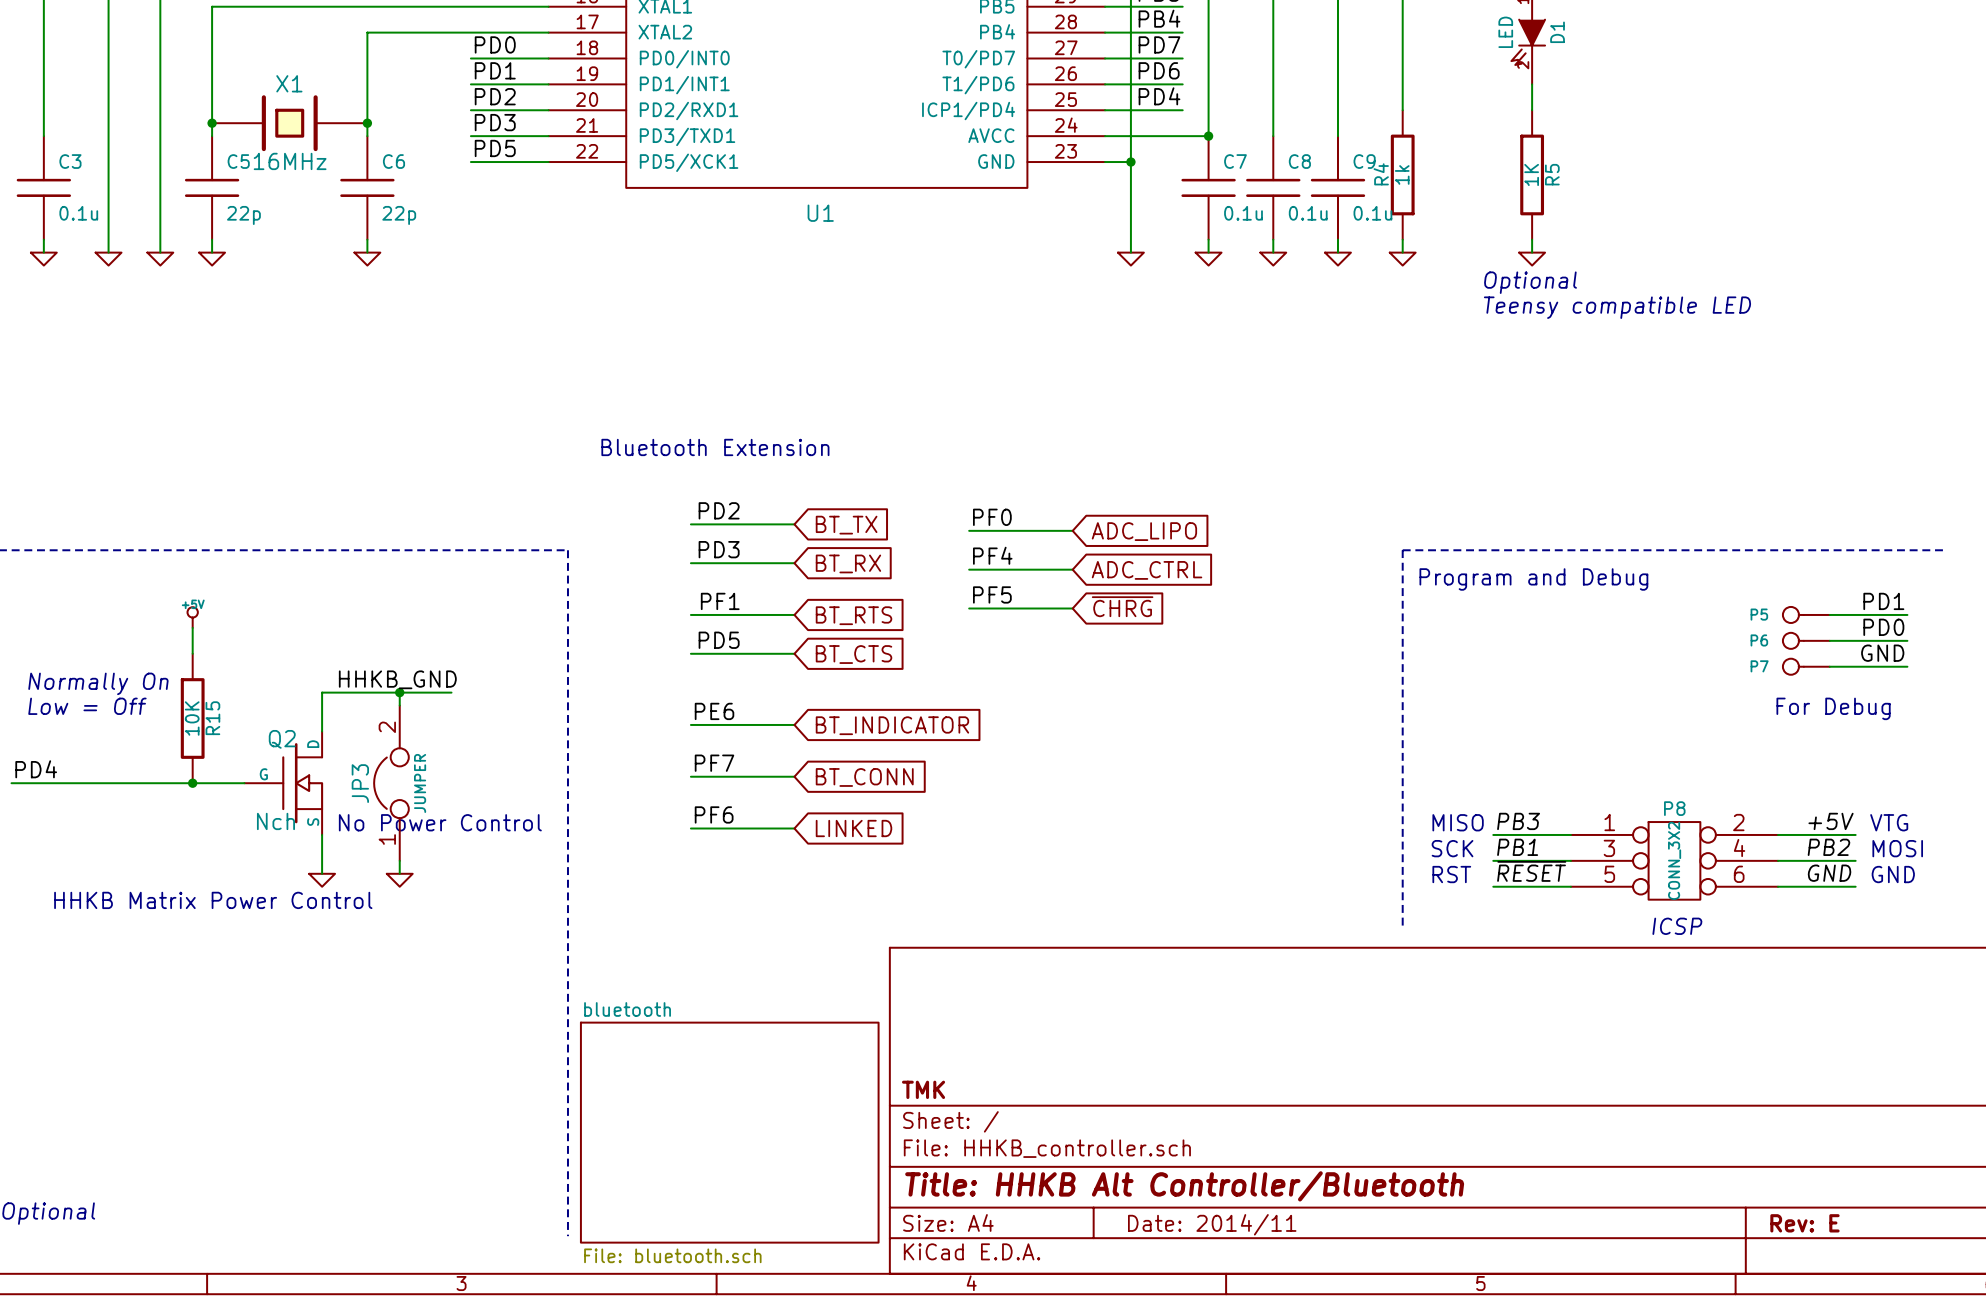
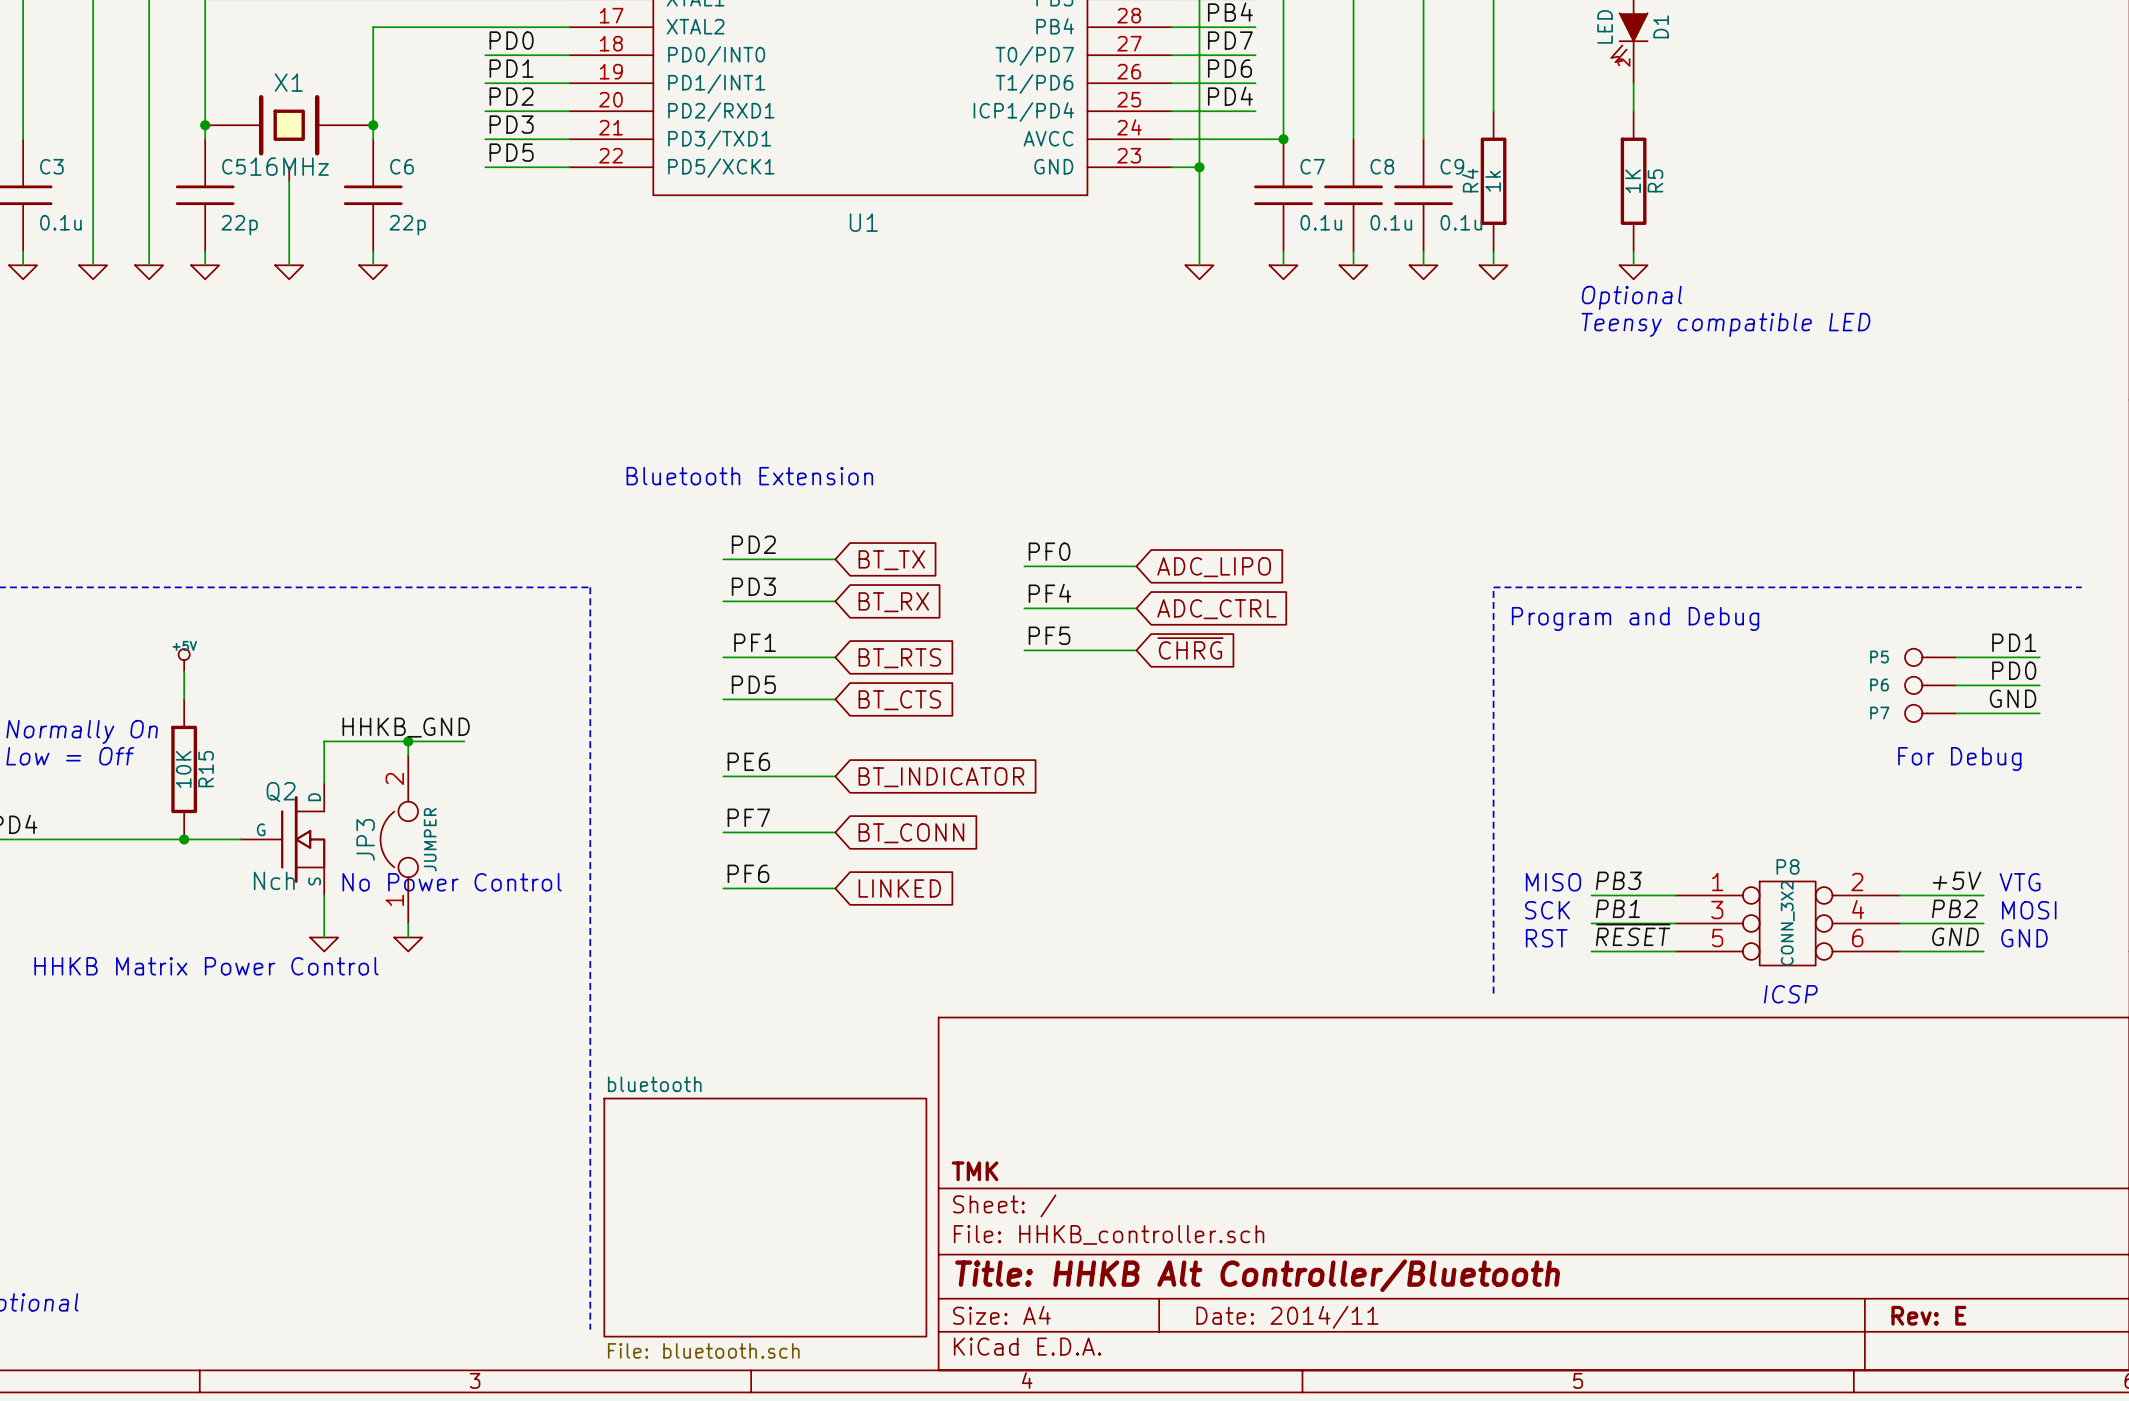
X1 symbol: [212, 95, 368, 152] -> [205, 94, 374, 182]
wire: none -> (289, 181) (289, 265)
power symbol: none -> (289, 272)

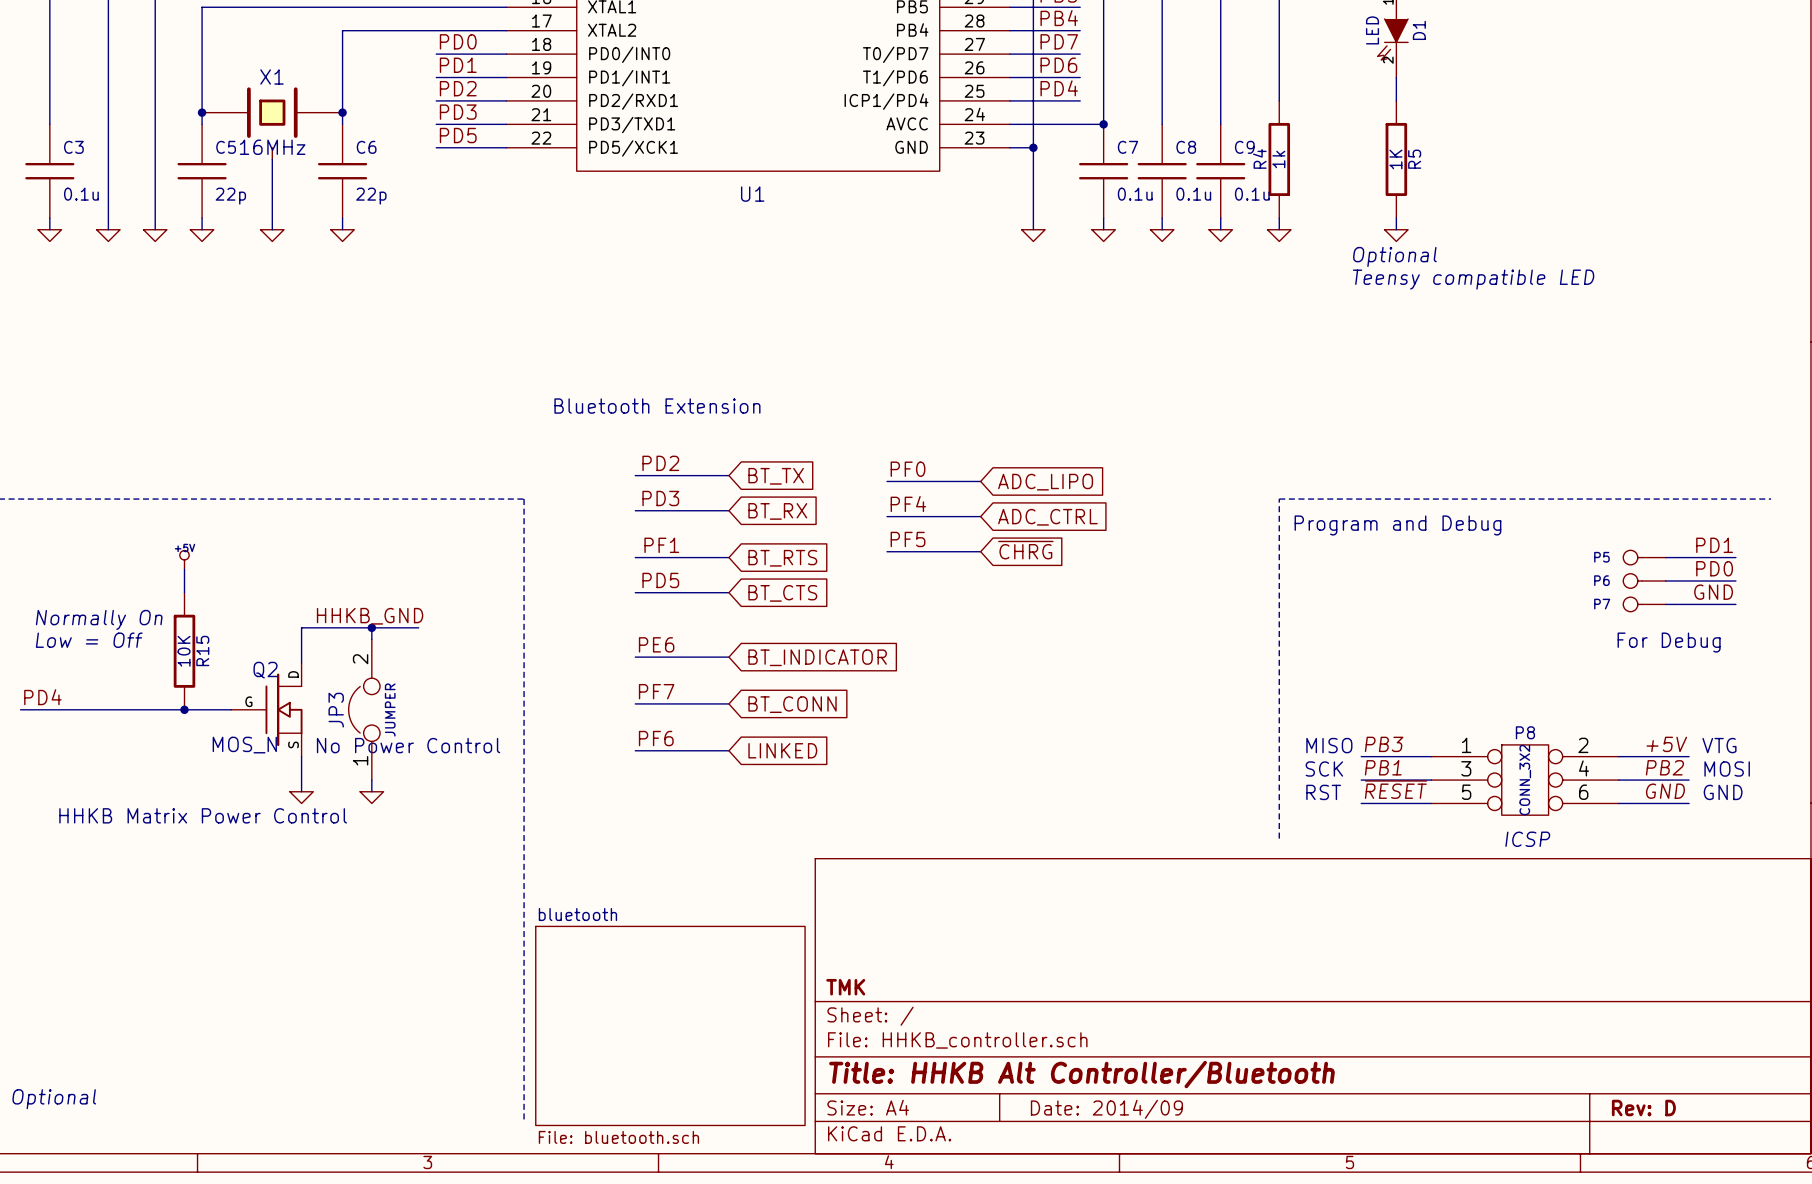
Q2 value: Nch (274, 880) -> MOS_N (244, 745)
title block: Rev: E (1928, 1315) -> Rev: D (1643, 1108)
title block: Date: 2014/11 (1287, 1317) -> Date: 2014/09 (1106, 1109)

